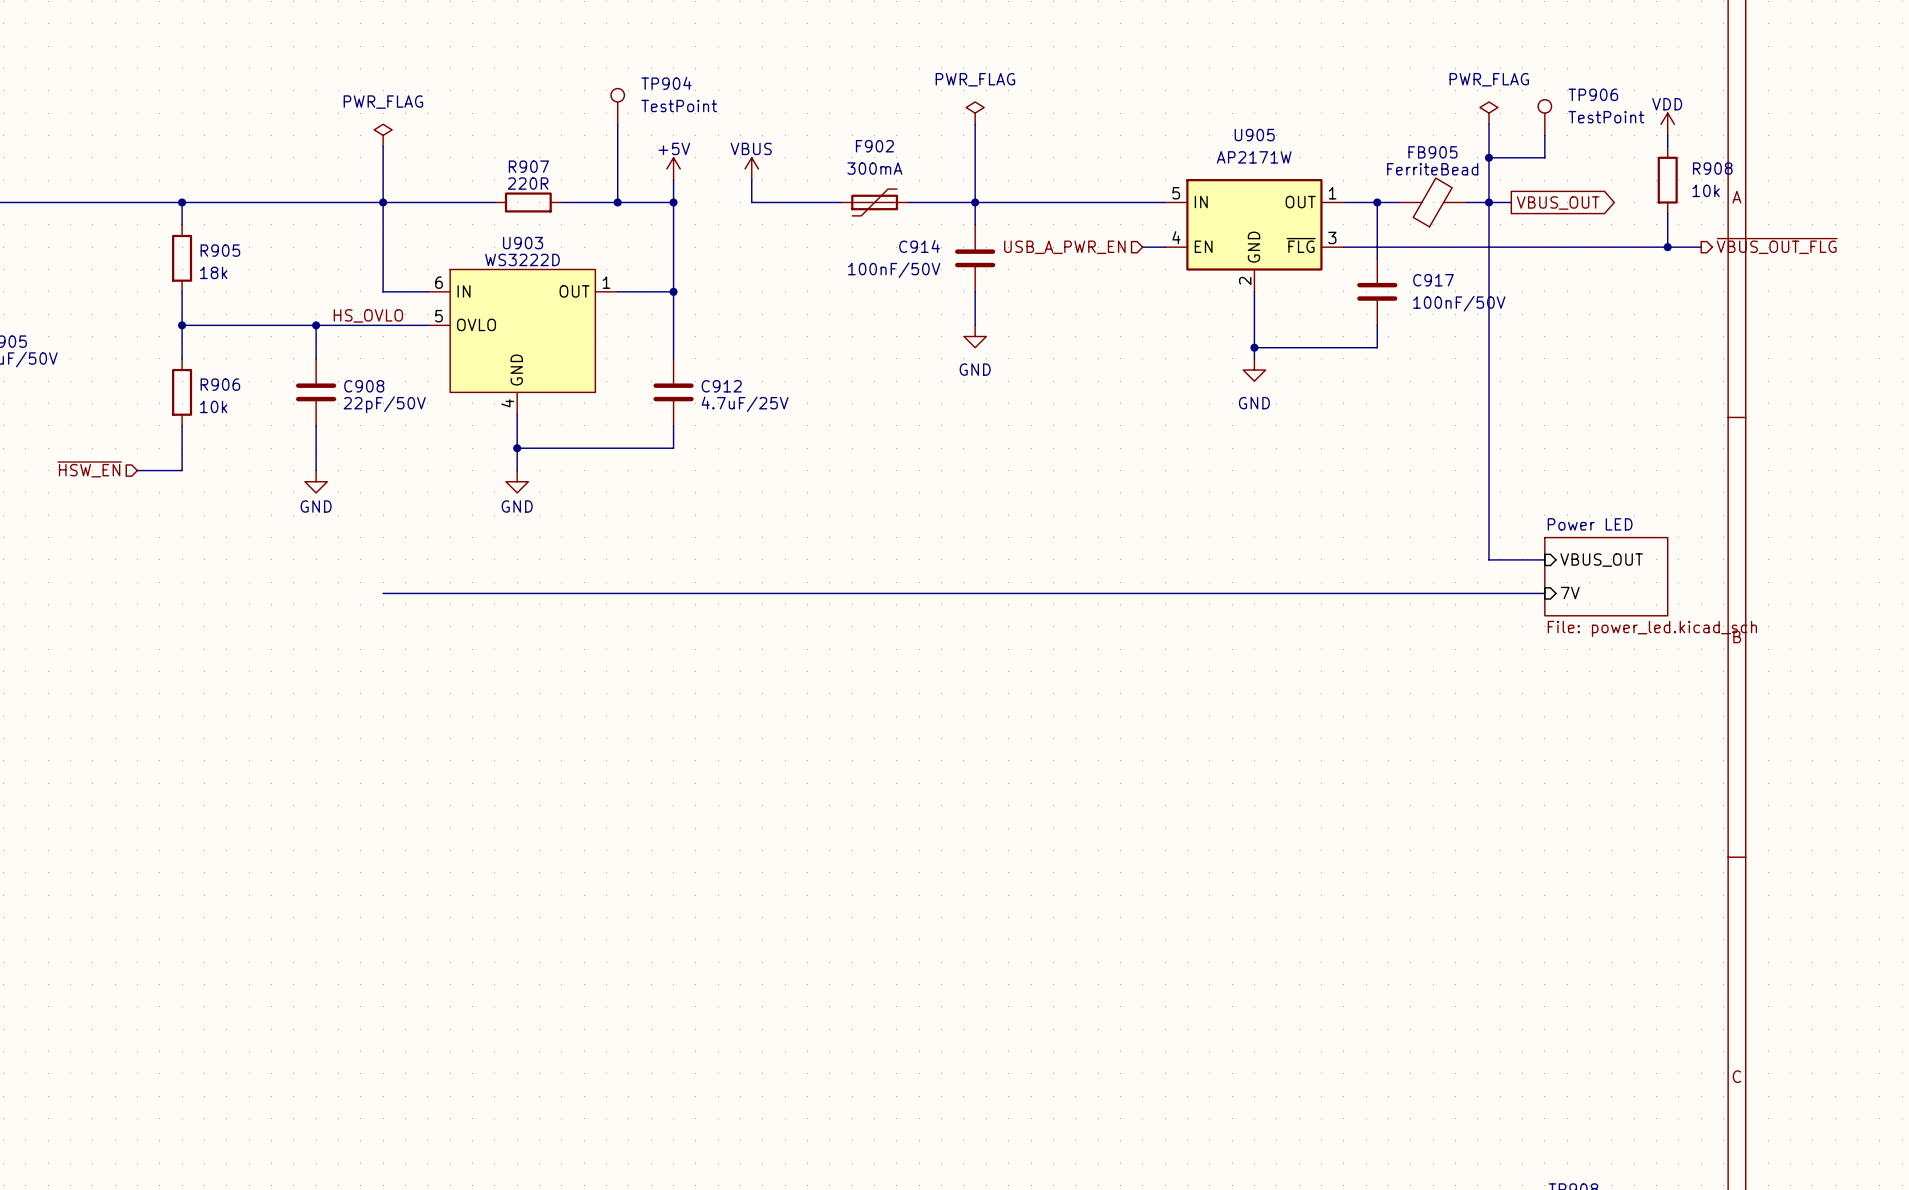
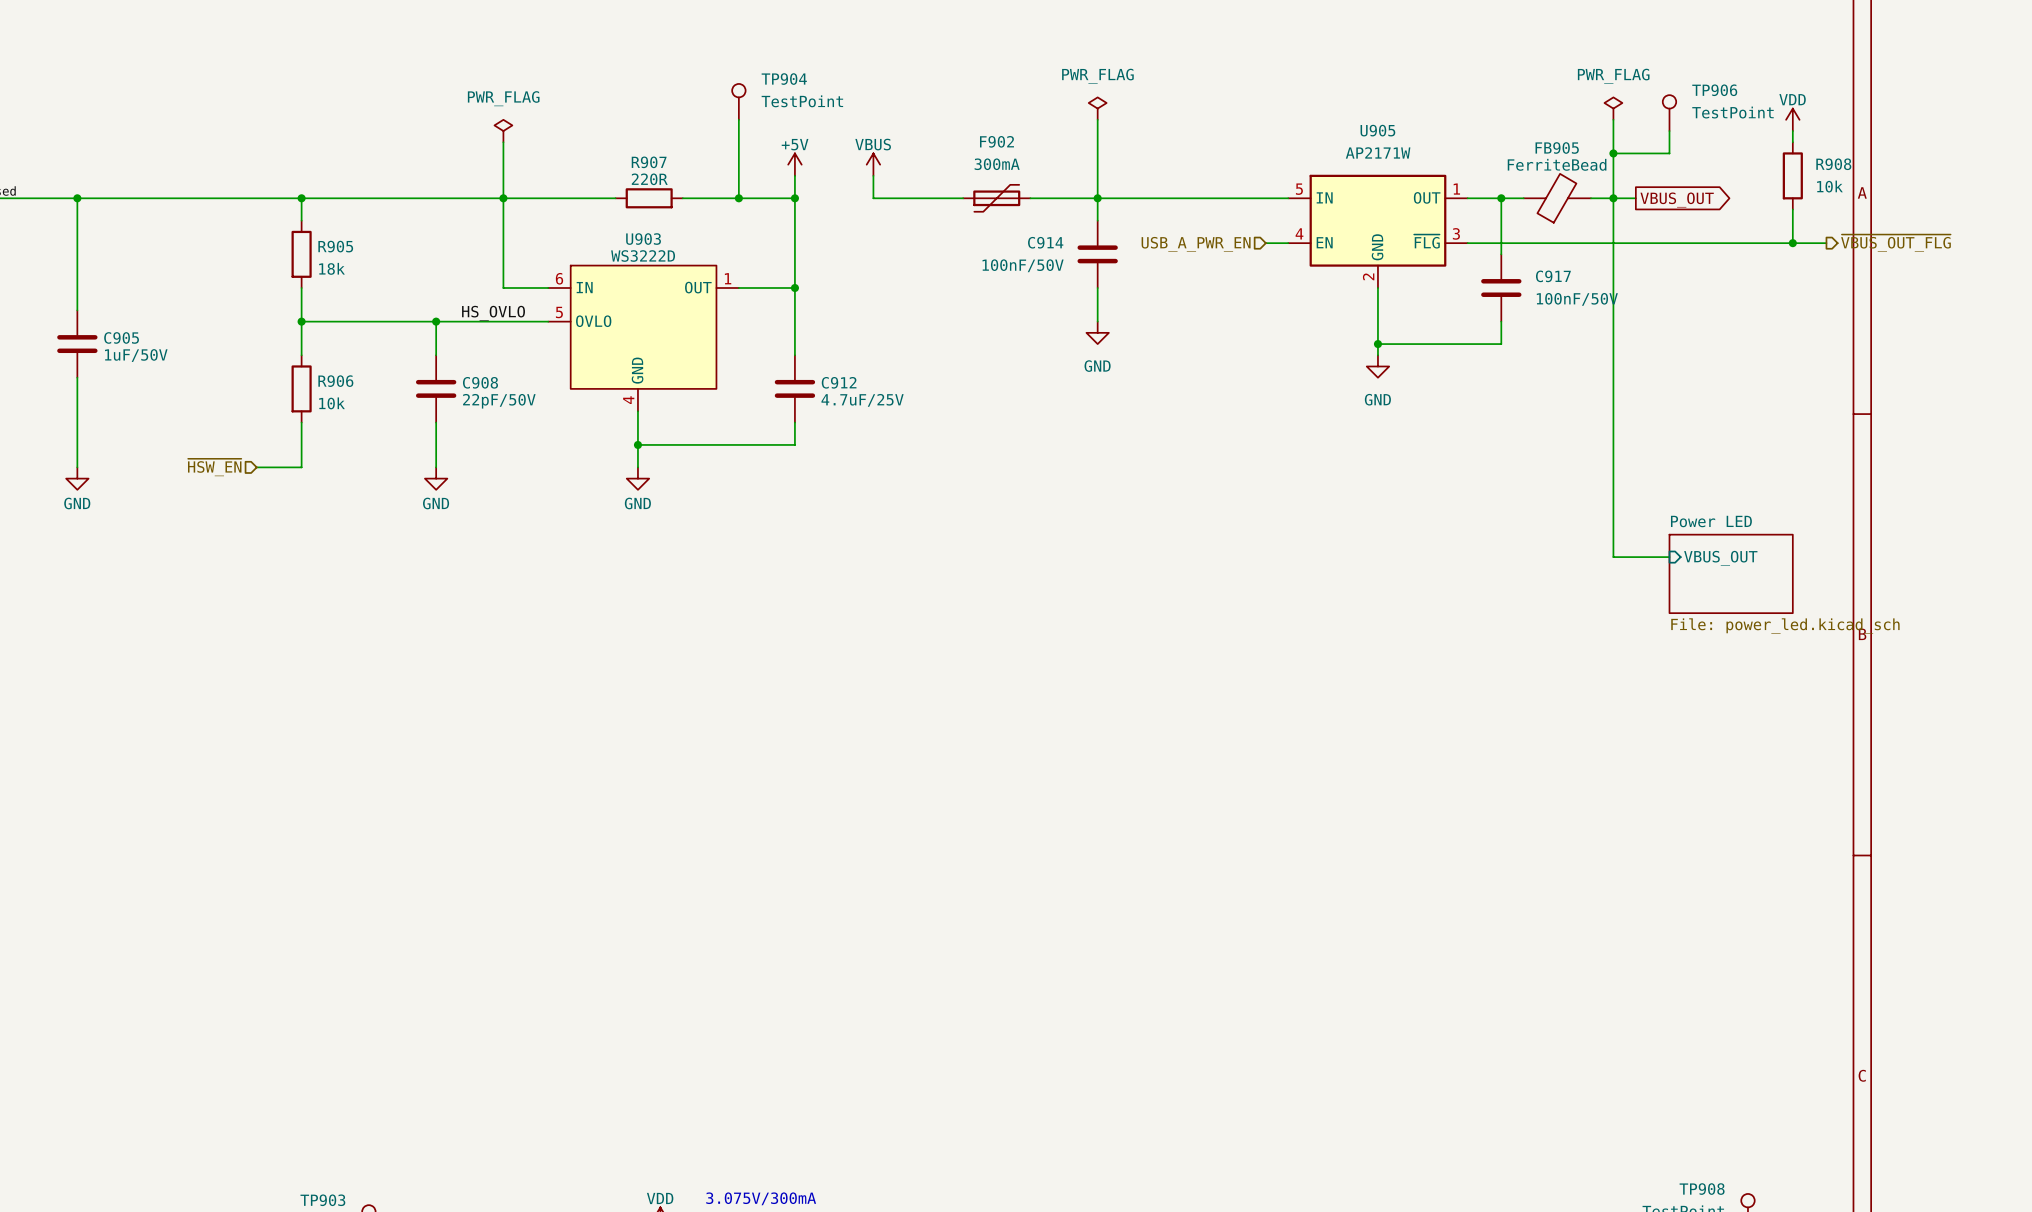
wire: (383, 593) (1544, 593) -> none
sheet pin: 7V (1570, 593) -> none

